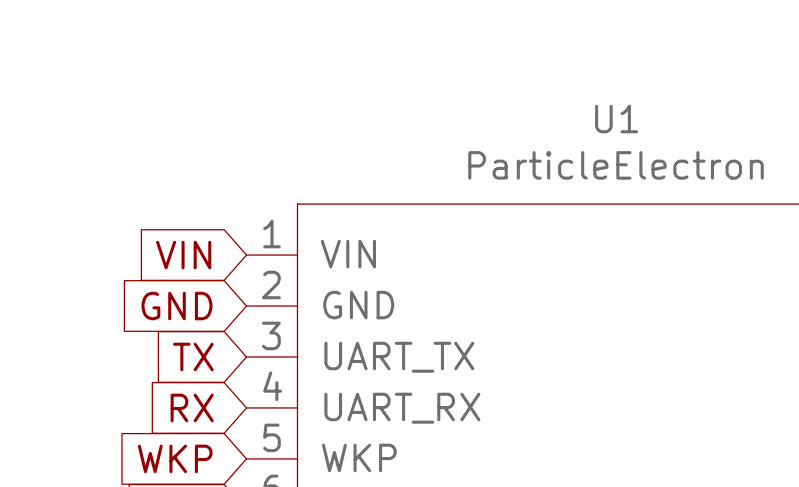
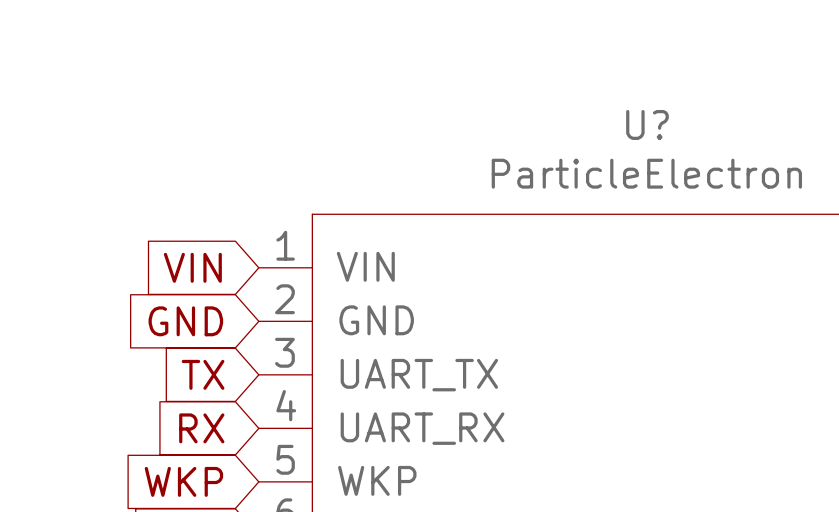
U1 name: U1 (616, 119) -> U? (647, 124)

